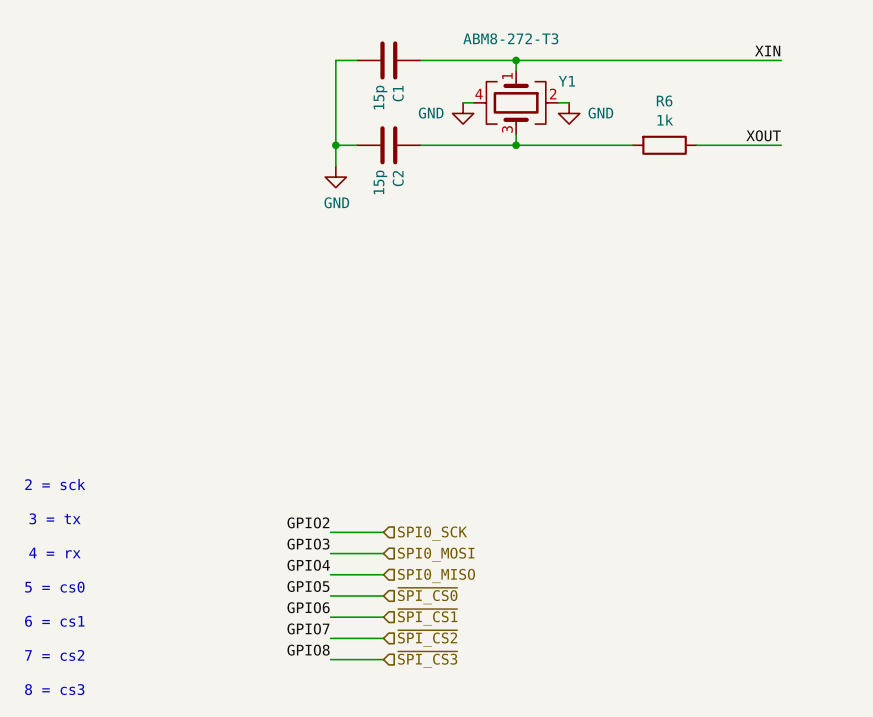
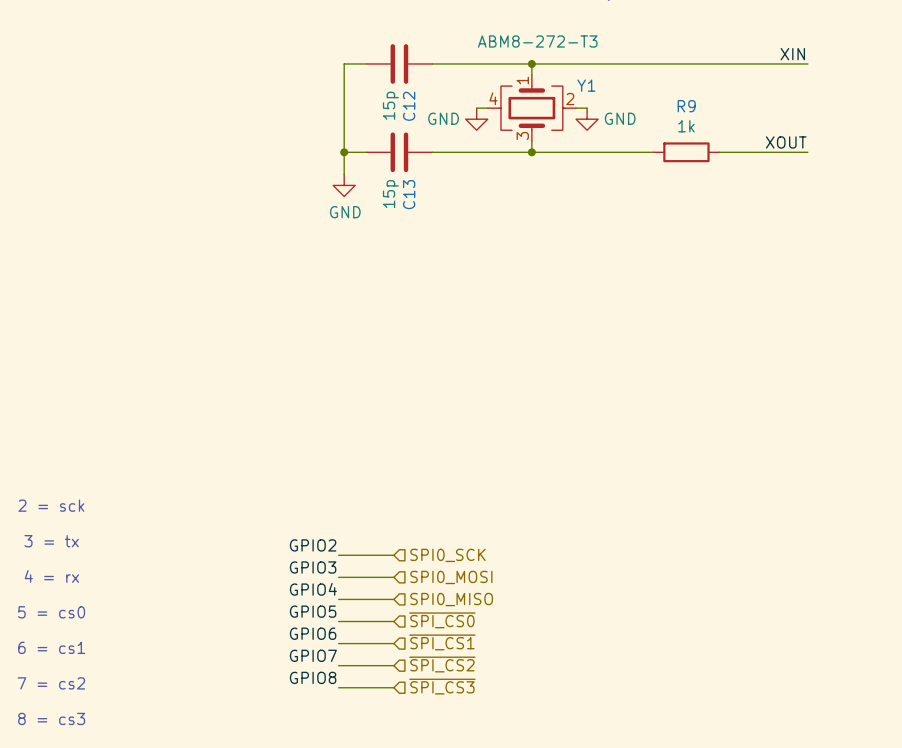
C1 name: C1 (398, 93) -> C12 (409, 106)
R6 name: R6 (664, 100) -> R9 (686, 106)
C2 name: C2 (398, 178) -> C13 (409, 194)

